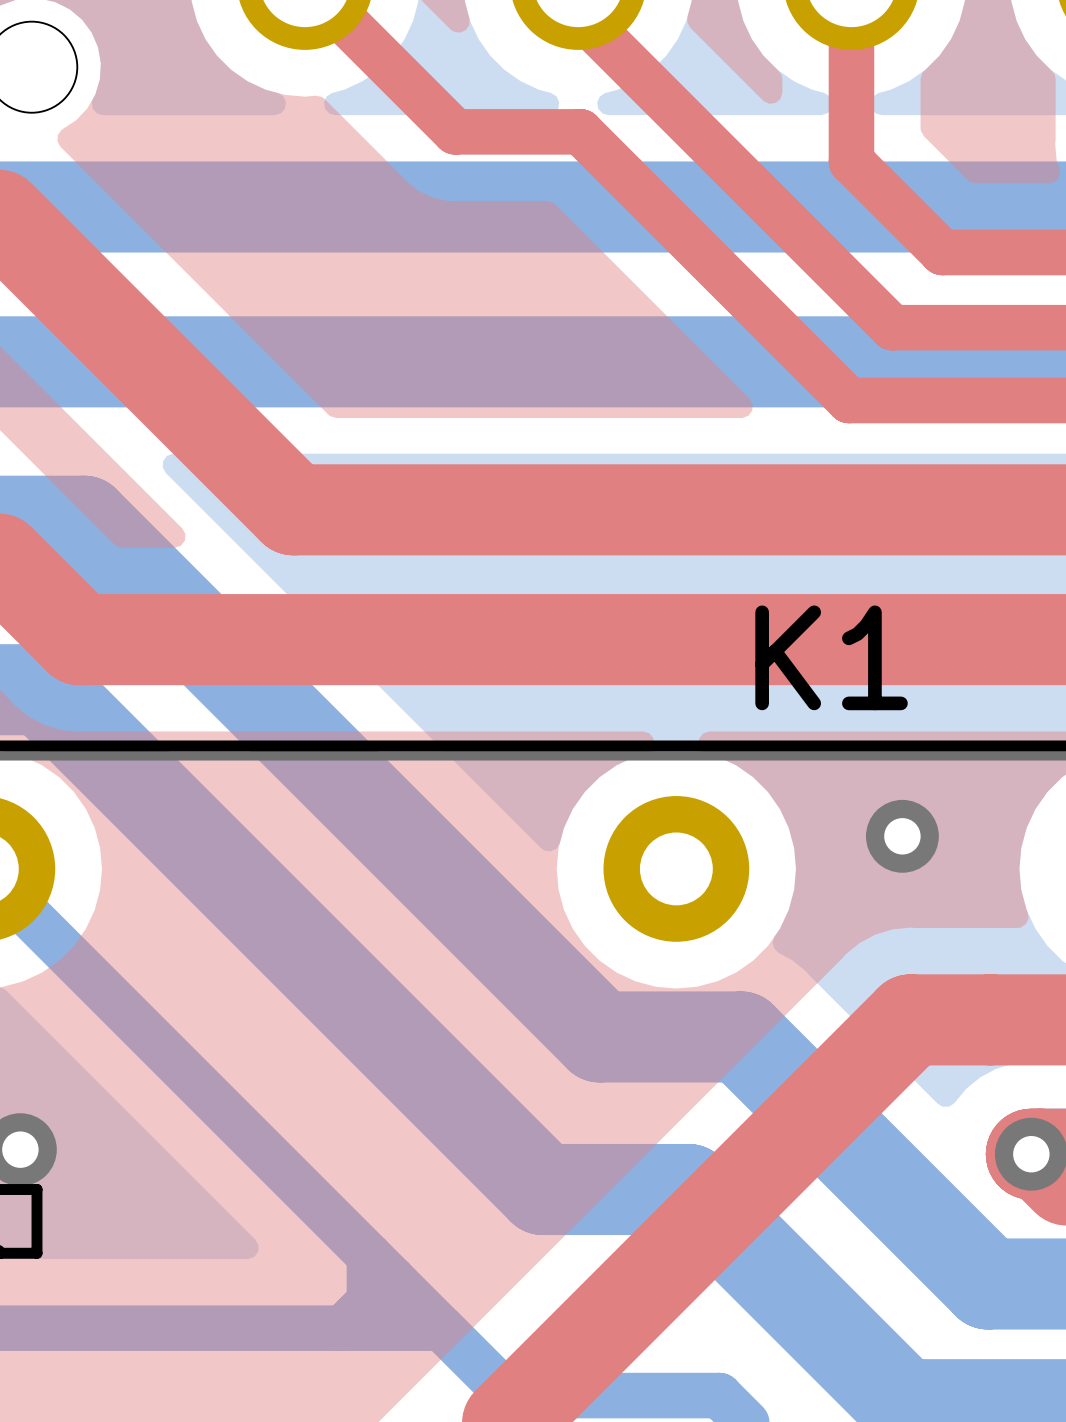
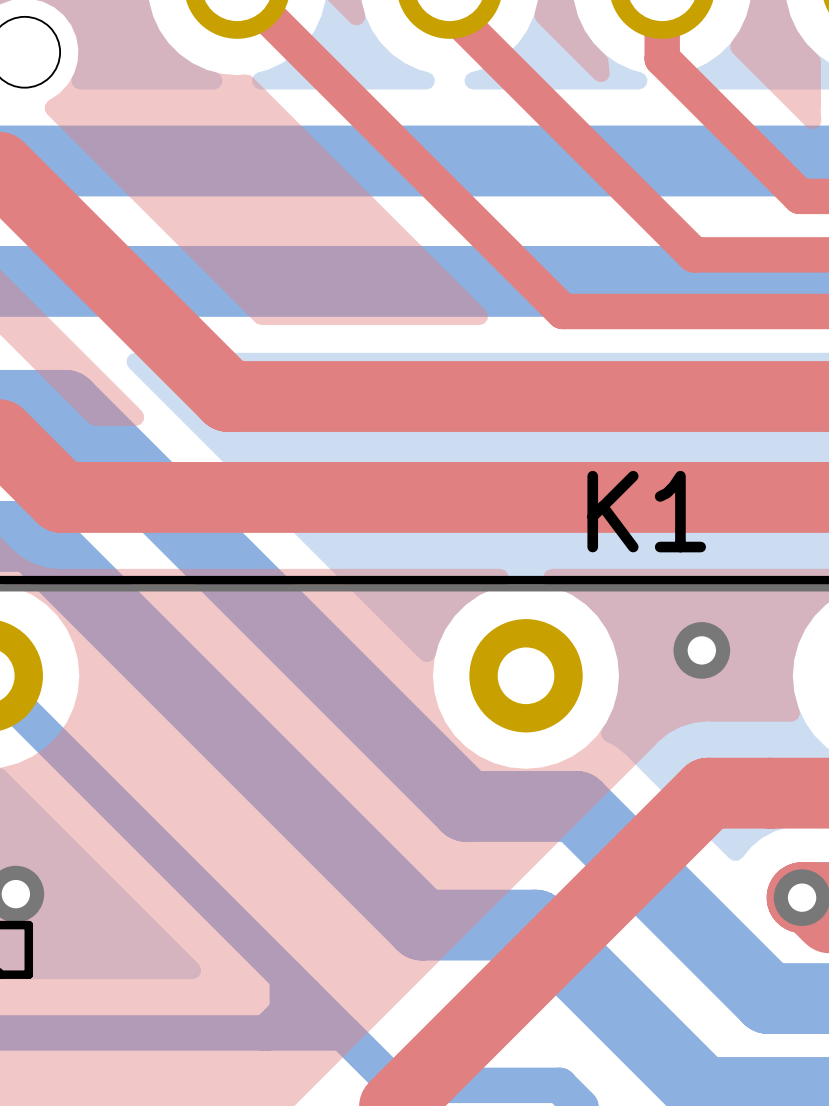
top track: (851, 75) (851, 161) (942, 252) (1028, 252) -> (662, 58) (799, 196)
top track: (455, 131) (580, 131) (849, 400) -> (354, 102) (563, 311) (660, 311)

